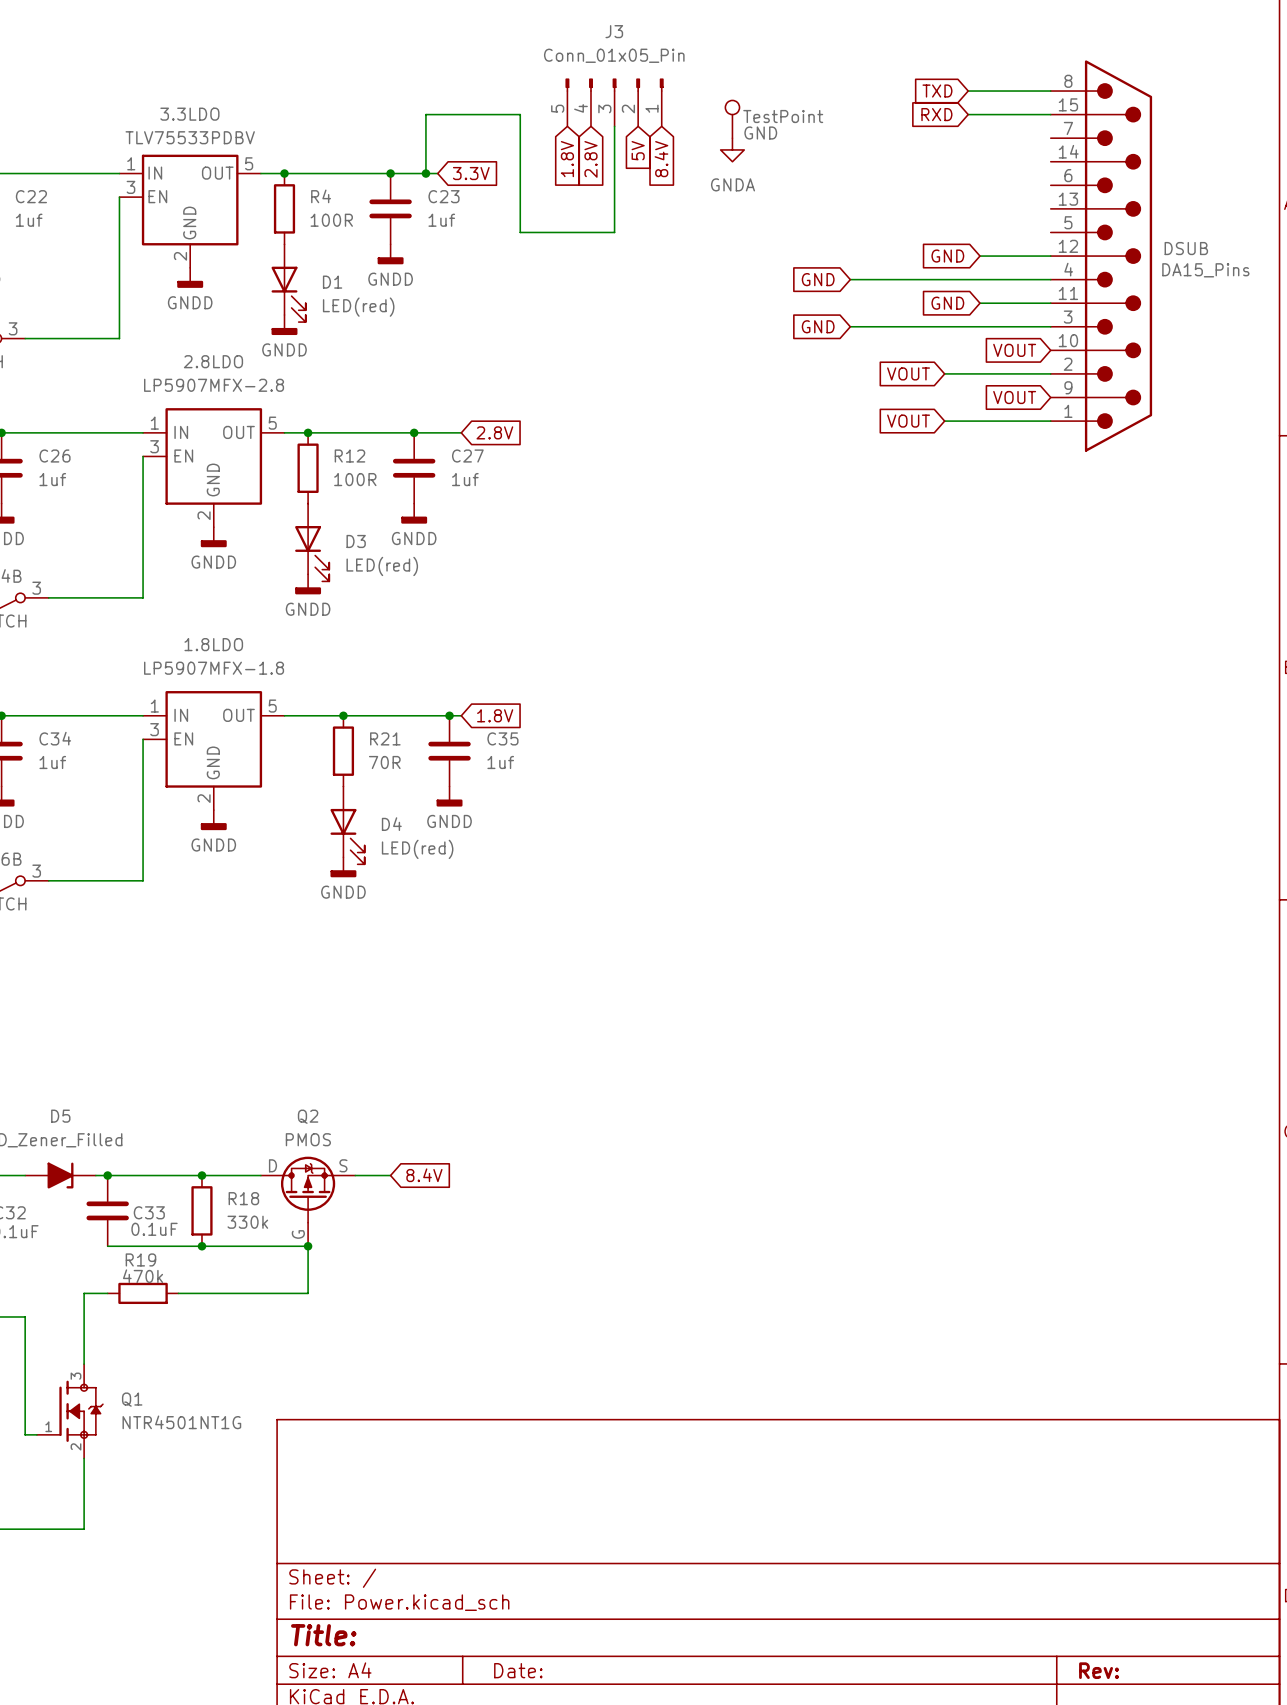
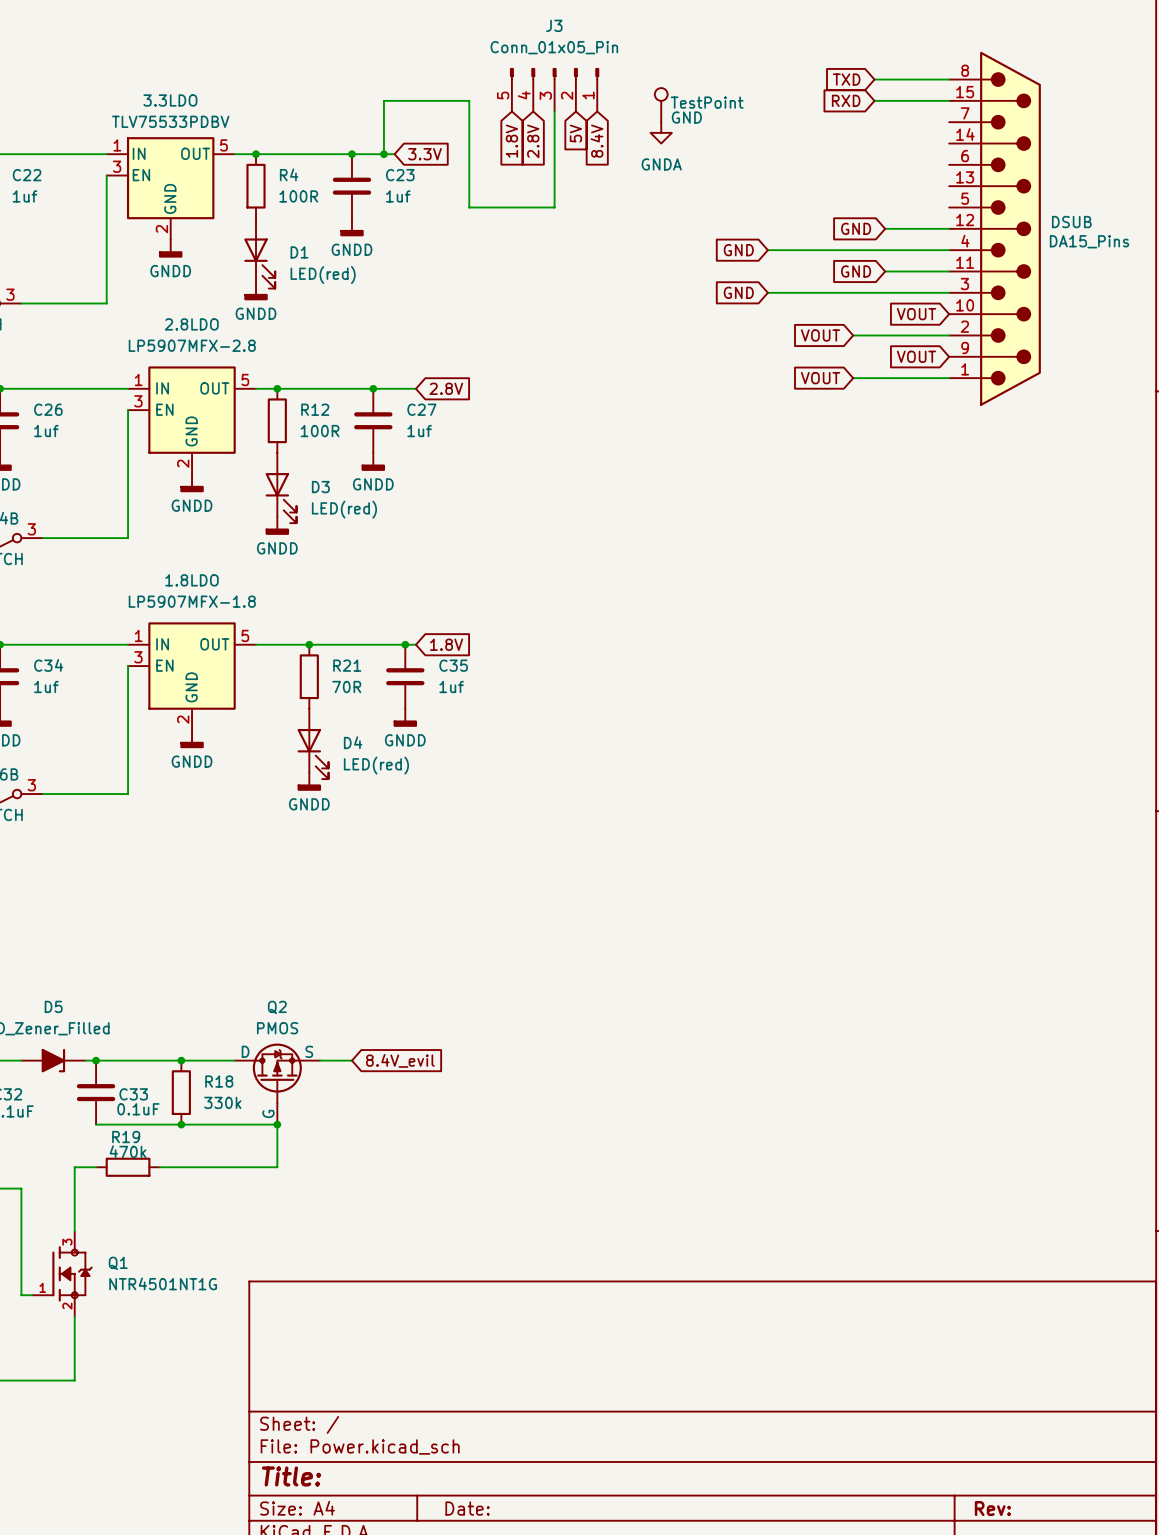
global label: 8.4V (424, 1175) -> 8.4V_evil (400, 1060)

